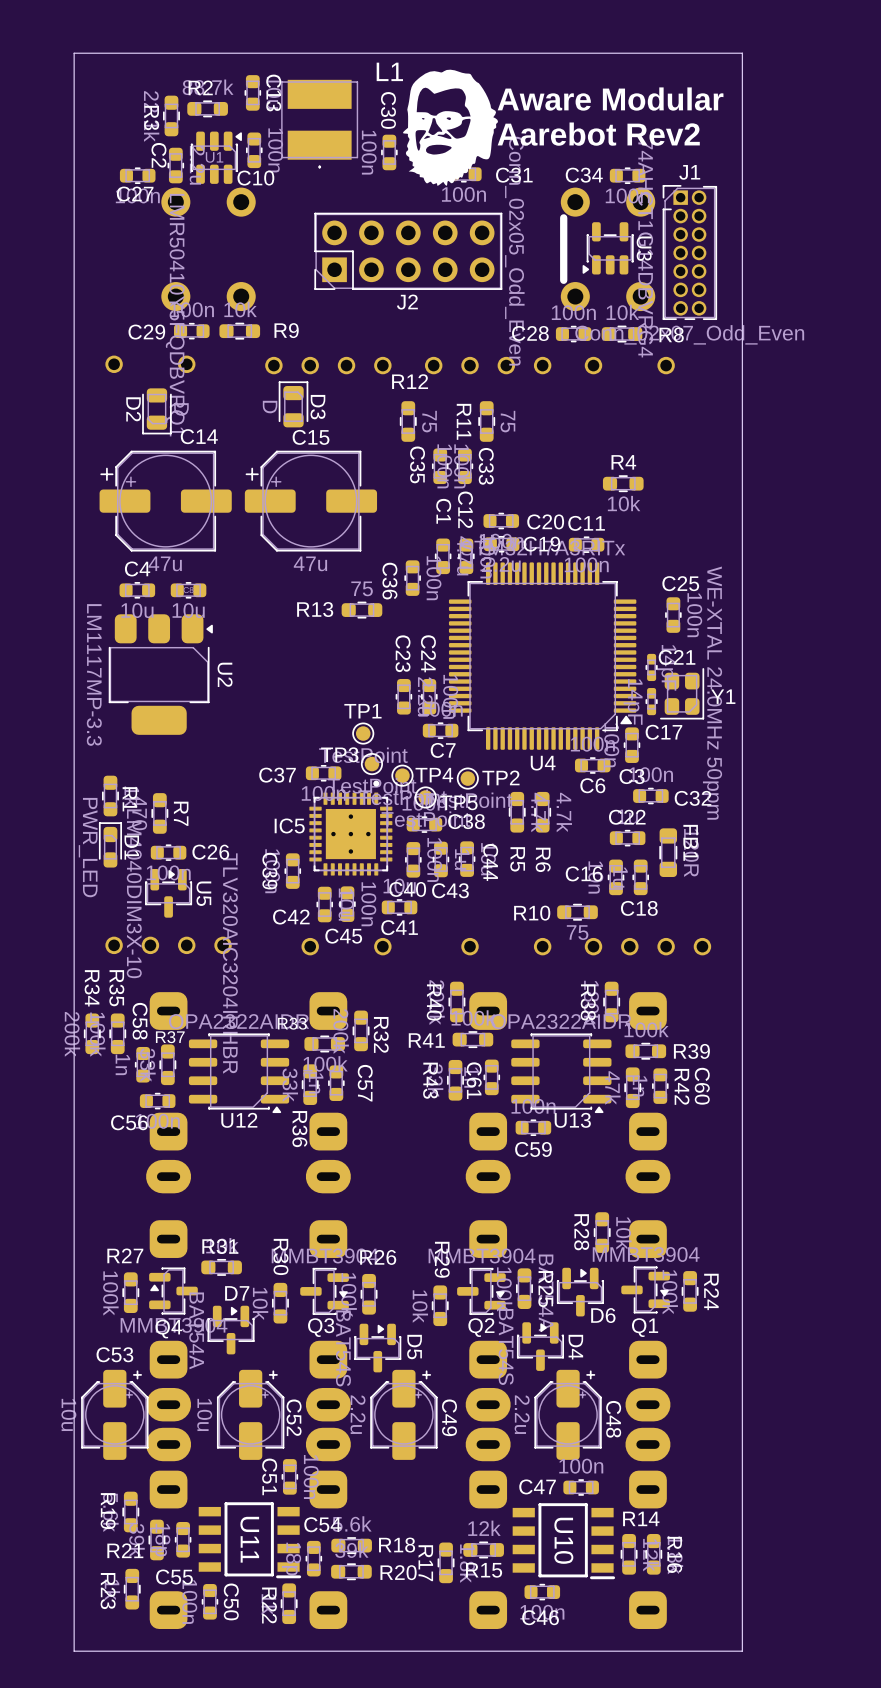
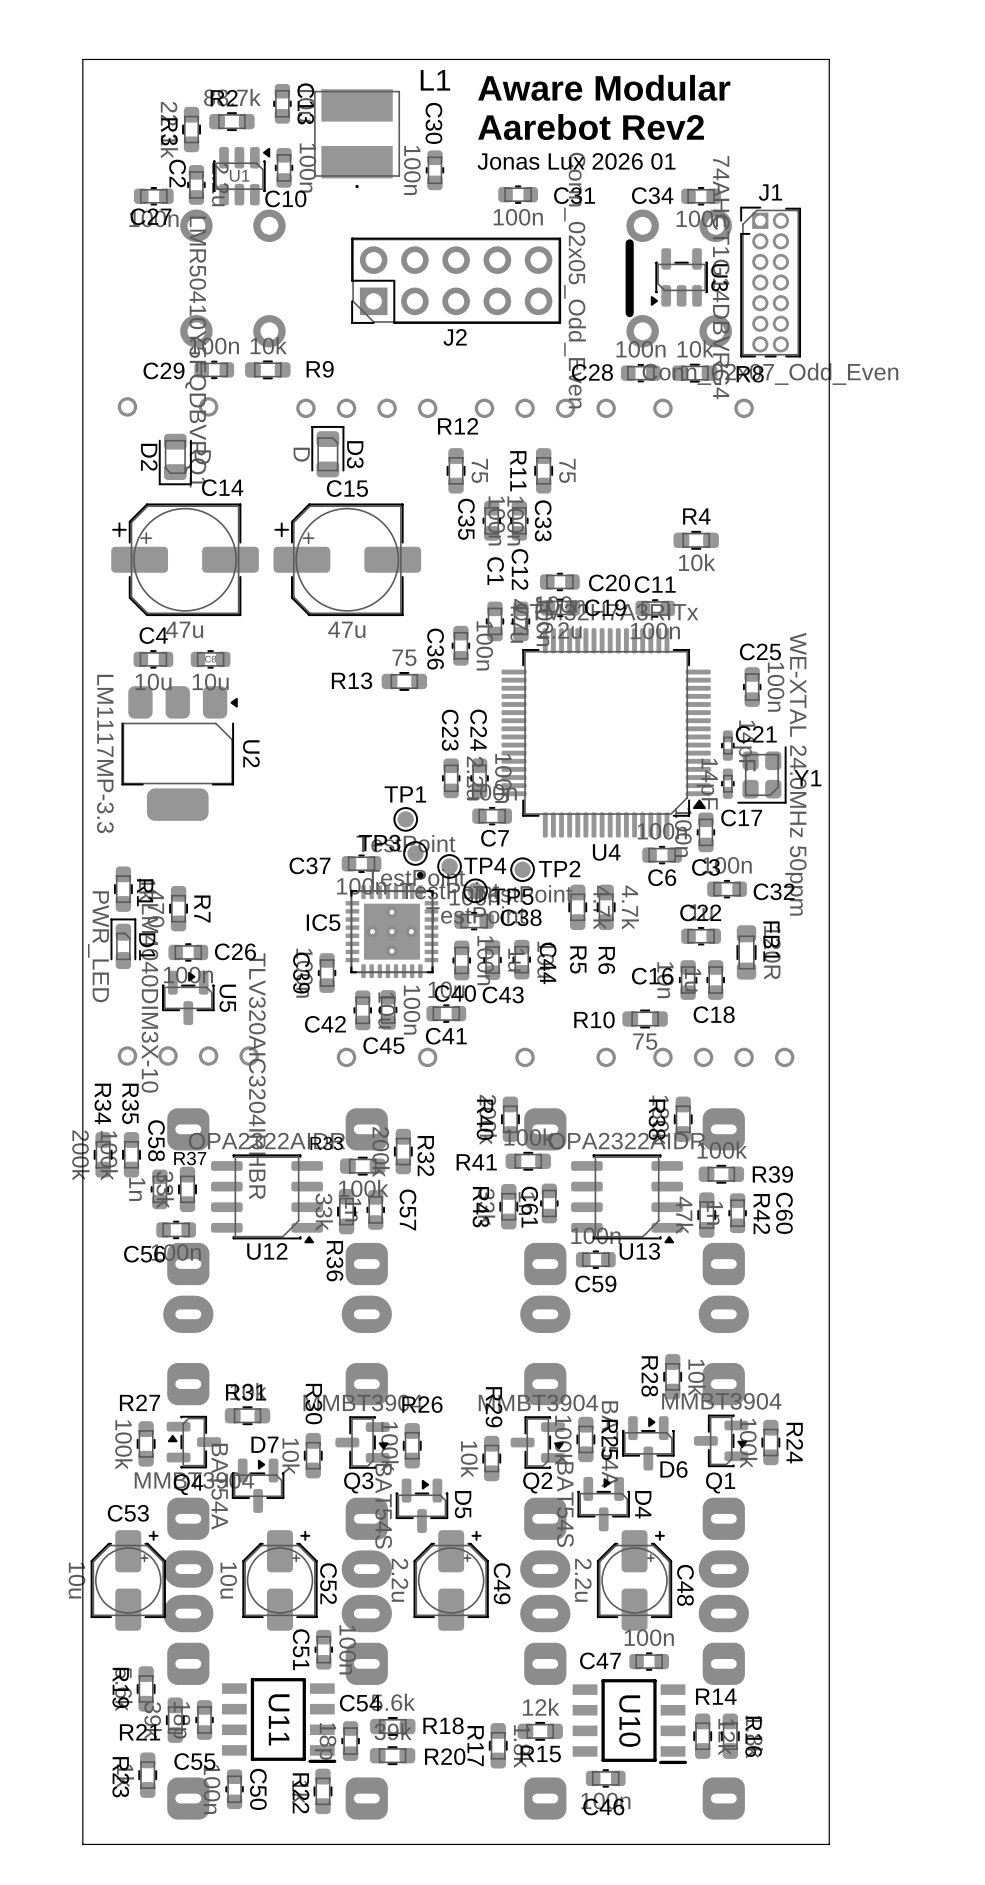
drawing: [402, 69, 498, 186] -> none
text position: Aware Modular (610, 99) -> Aware Modular (604, 87)
text position: Aarebot Rev2 (598, 134) -> Aarebot Rev2 (591, 127)
text: none -> Jonas Lux 2026 01 (576, 161)

